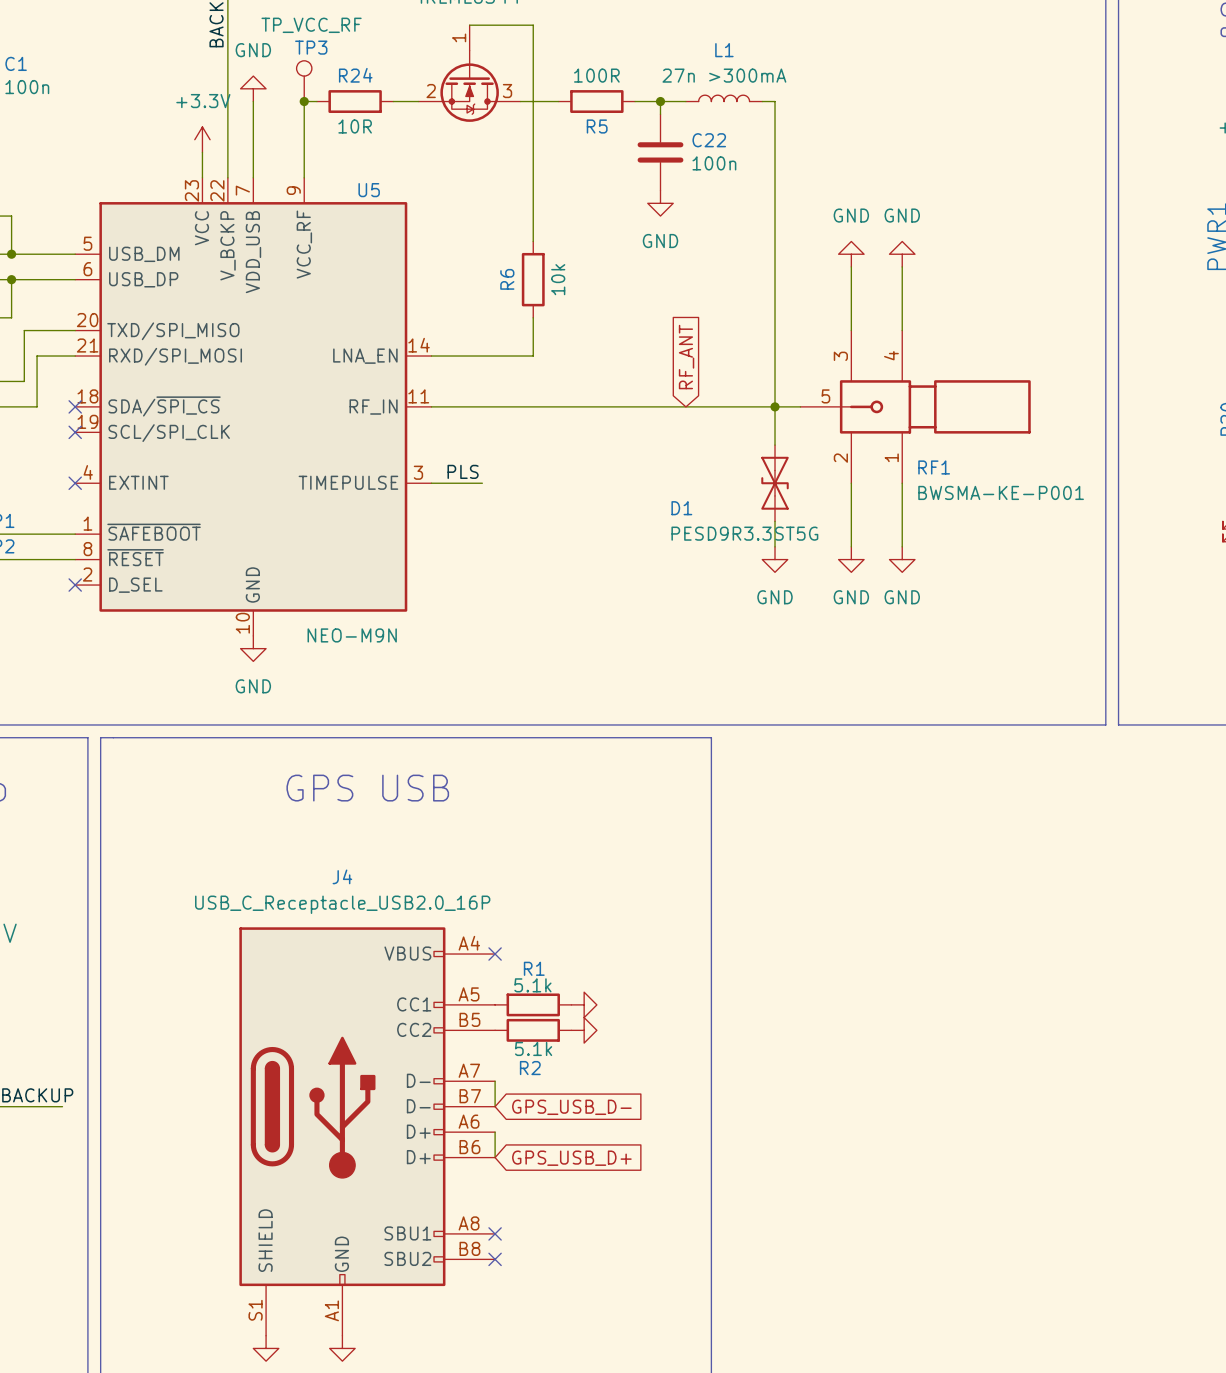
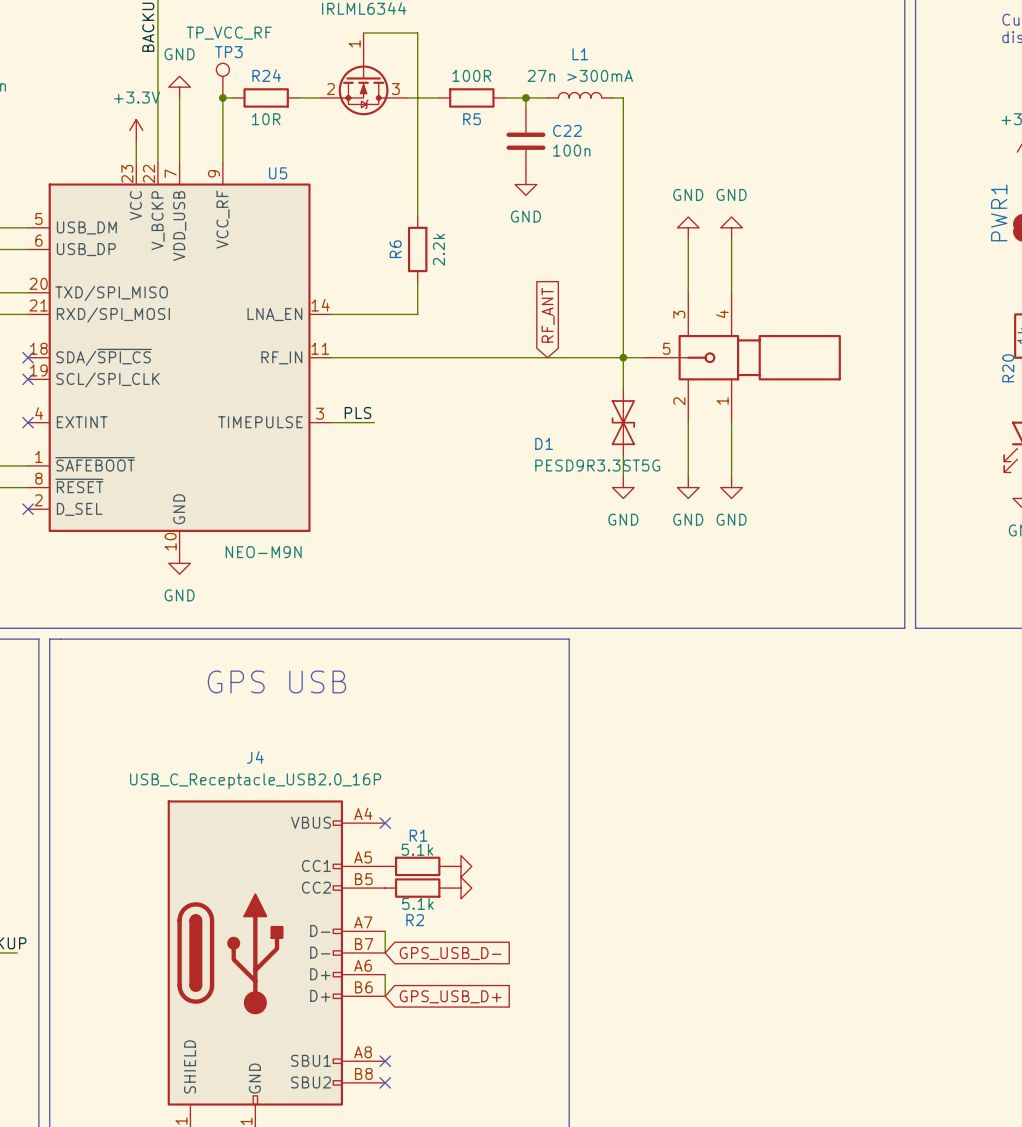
R6 value: 10k (558, 279) -> 2.2k (438, 249)
RF1 name: RF1 (934, 467) -> none
RF1 value: BWSMA-KE-P001 (1001, 492) -> none

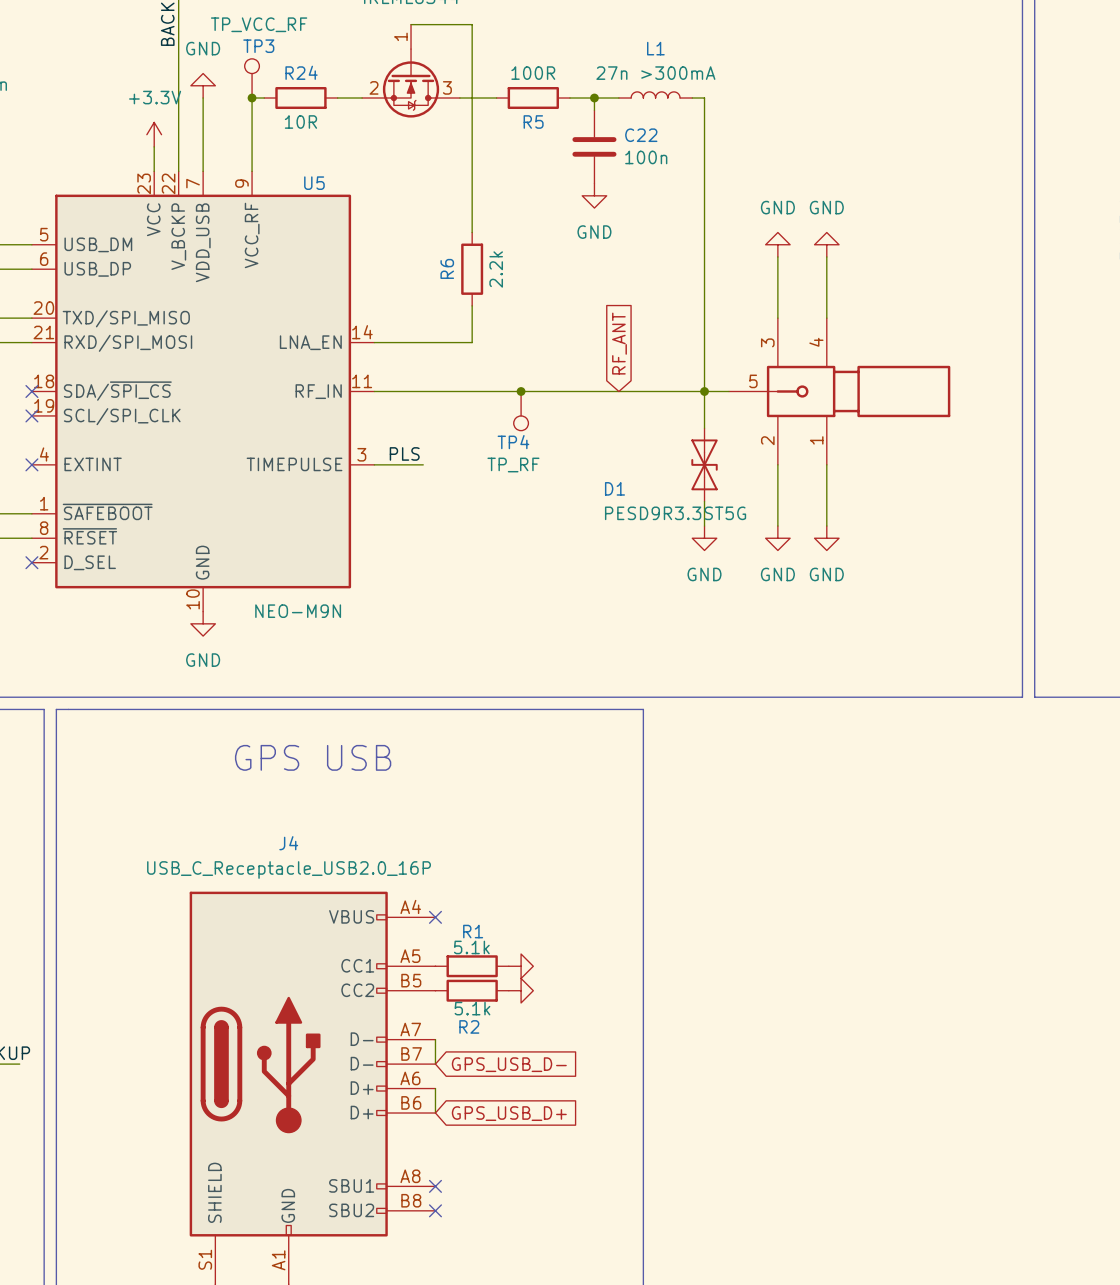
junction: none -> (521, 391)
TP4: none -> TP_RF (521, 411)

